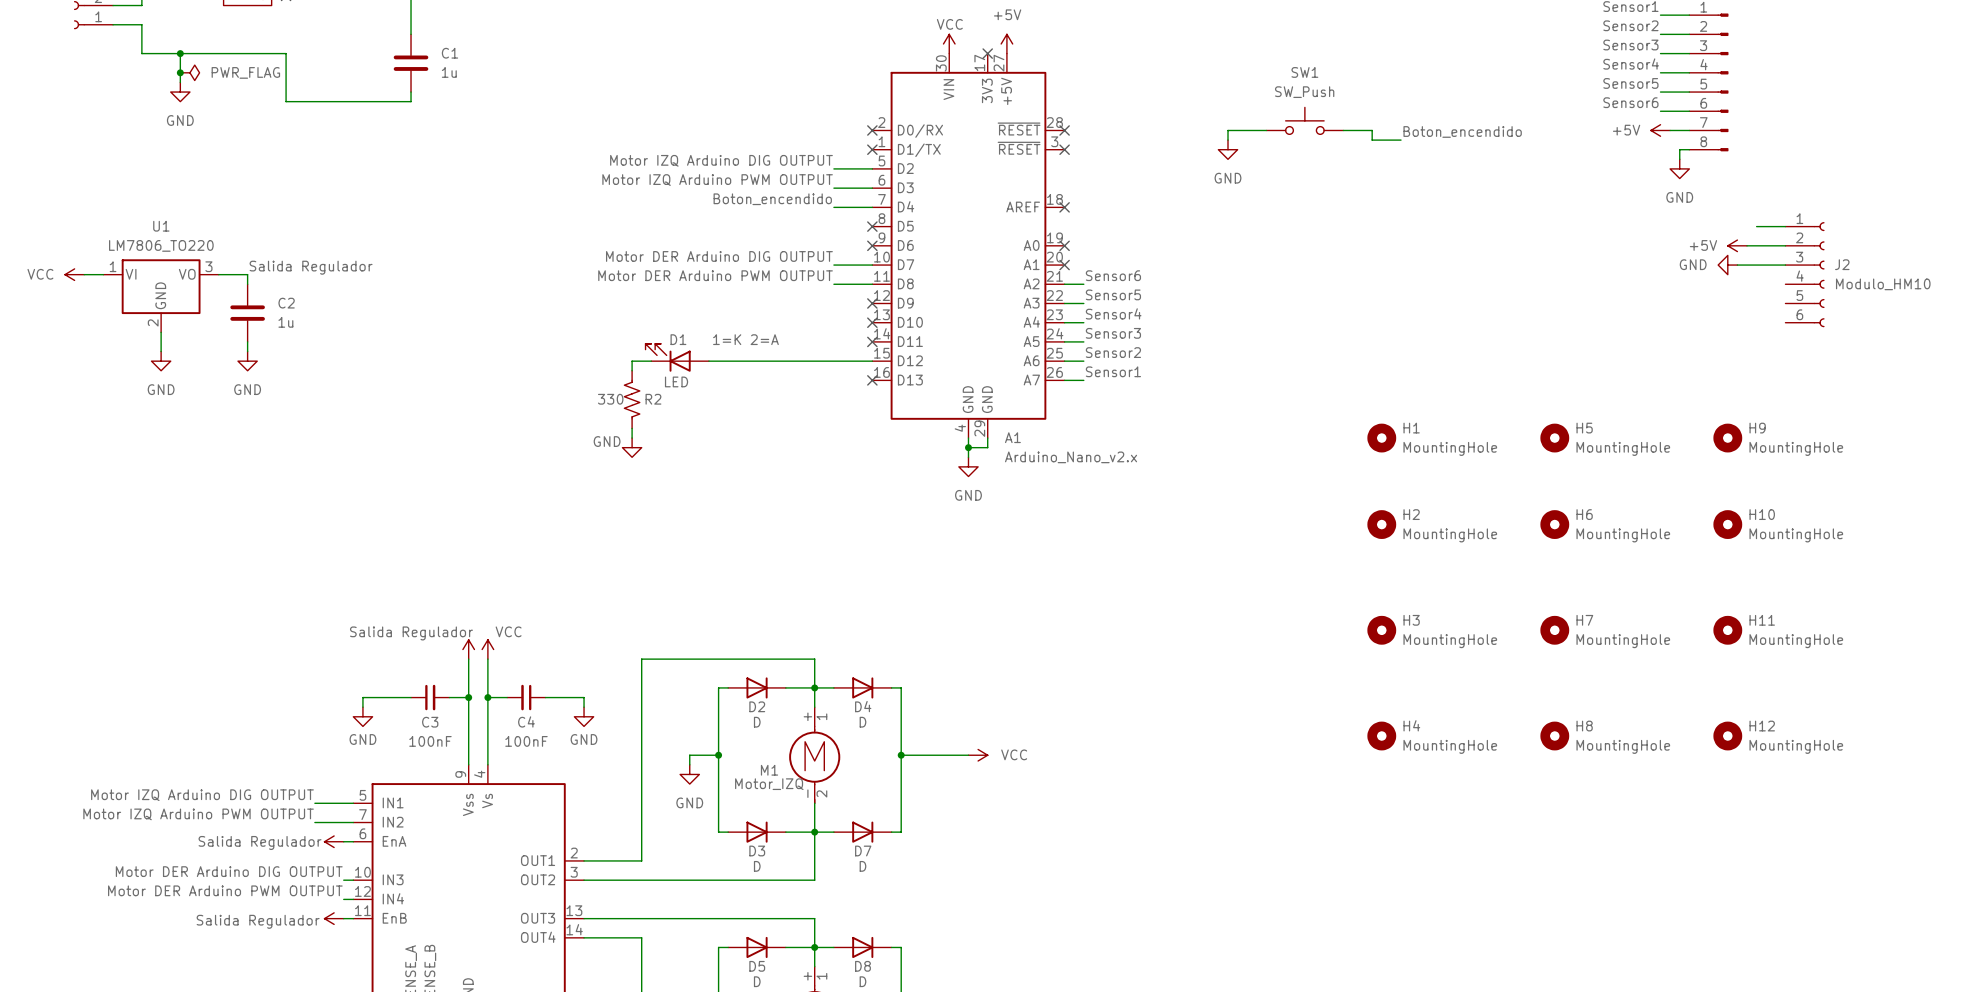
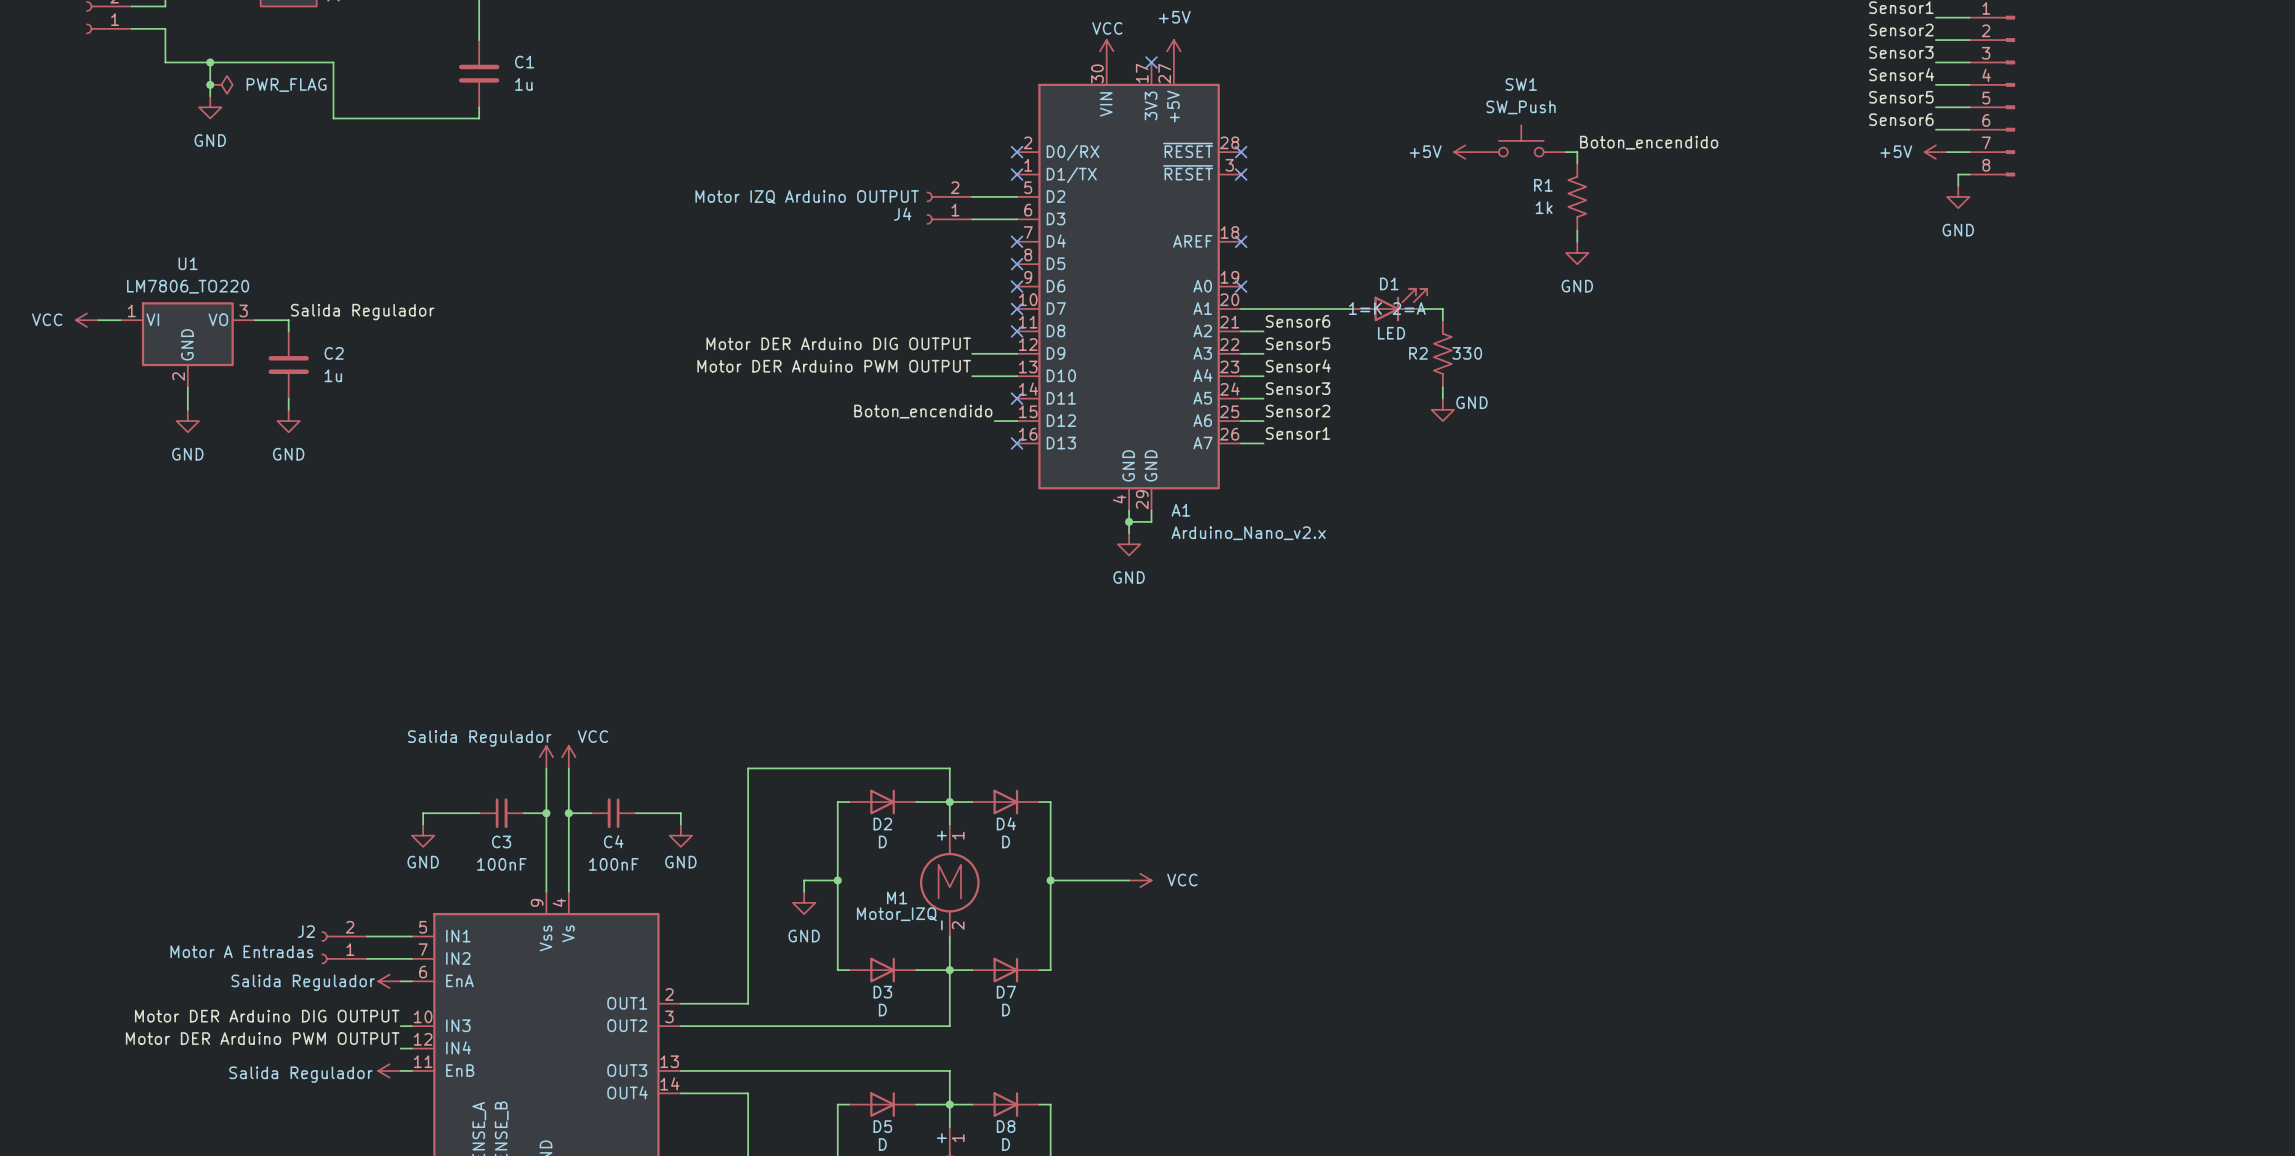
power symbol: none -> +5V (1465, 152)
wire: (1266, 130) (1228, 130) (1228, 140) -> none
wire: (1352, 130) (1372, 130) (1372, 140) (1401, 140) -> (1577, 152) (1577, 163)
label position: Boton_encendido (1462, 131) -> Boton_encendido (1649, 142)
power symbol: GND (1228, 149) -> none
label: Motor IZQ Arduino DIG OUTPUT (721, 160) -> none
R1: none -> 1k (1577, 196)
J4: none -> Motor IZQ Arduino OUTPUT (949, 208)
label: Motor IZQ Arduino PWM OUTPUT (717, 180) -> none
wire: none -> (1577, 230) (1577, 241)
label position: Boton_encendido (772, 199) -> Boton_encendido (923, 411)
wire: (833, 207) (872, 207) -> none
no-connect mark: none -> (1017, 241)
power symbol: none -> GND (1577, 252)
J2 symbol: [1785, 222, 1825, 328] -> [321, 931, 368, 965]
wire: (1756, 226) (1785, 226) -> none
power symbol: +5V (1737, 245) -> none
wire: (1747, 245) (1785, 245) -> none
label position: Motor DER Arduino DIG OUTPUT (719, 256) -> Motor DER Arduino DIG OUTPUT (838, 343)
J2 name position: J2 (1842, 264) -> J2 (306, 931)
wire: (833, 265) (872, 265) -> (972, 353) (1017, 353)
no-connect mark: none -> (1017, 308)
wire: none -> (1241, 308) (1353, 308)
no-connect mark: (1064, 265) -> none
wire: none -> (1420, 308) (1442, 308) (1442, 320)
power symbol: GND (1727, 265) -> none
wire: (1737, 265) (1785, 265) -> none
label position: Motor DER Arduino PWM OUTPUT (715, 275) -> Motor DER Arduino PWM OUTPUT (834, 366)
wire: (833, 284) (872, 284) -> (972, 376) (1017, 376)
no-connect mark: none -> (1017, 331)
J2 value: Modulo_HM10 (1883, 284) -> Motor A Entradas (241, 951)
no-connect mark: (872, 303) -> none
no-connect mark: (872, 322) -> none
wire: none -> (1442, 387) (1442, 398)
D1 text position: 1=K 2=A (745, 339) -> 1=K 2=A (1387, 308)
power symbol: none -> GND (1442, 409)
D1 flip: as is (668, 357) -> left-right (1400, 305)
D1 position: (677, 357) -> (1390, 305)
wire: (651, 361) (632, 361) (632, 370) -> none
wire: (708, 361) (853, 361) -> none
R2 flip: as is (632, 399) -> left-right (1442, 353)
R2 position: (632, 399) -> (1442, 353)
wire: (632, 428) (632, 438) -> none
H1: MountingHole (1381, 438) -> none
H5: MountingHole (1554, 438) -> none
H9: MountingHole (1727, 438) -> none
power symbol: GND (632, 447) -> none
H2: MountingHole (1381, 524) -> none
H6: MountingHole (1554, 524) -> none
H10: MountingHole (1727, 524) -> none
H3: MountingHole (1381, 630) -> none
H7: MountingHole (1554, 630) -> none
H11: MountingHole (1727, 630) -> none
H4: MountingHole (1381, 736) -> none
H8: MountingHole (1554, 736) -> none
H12: MountingHole (1727, 736) -> none
label: Motor IZQ Arduino DIG OUTPUT (202, 795) -> none
label: Motor IZQ Arduino PWM OUTPUT (198, 814) -> none

